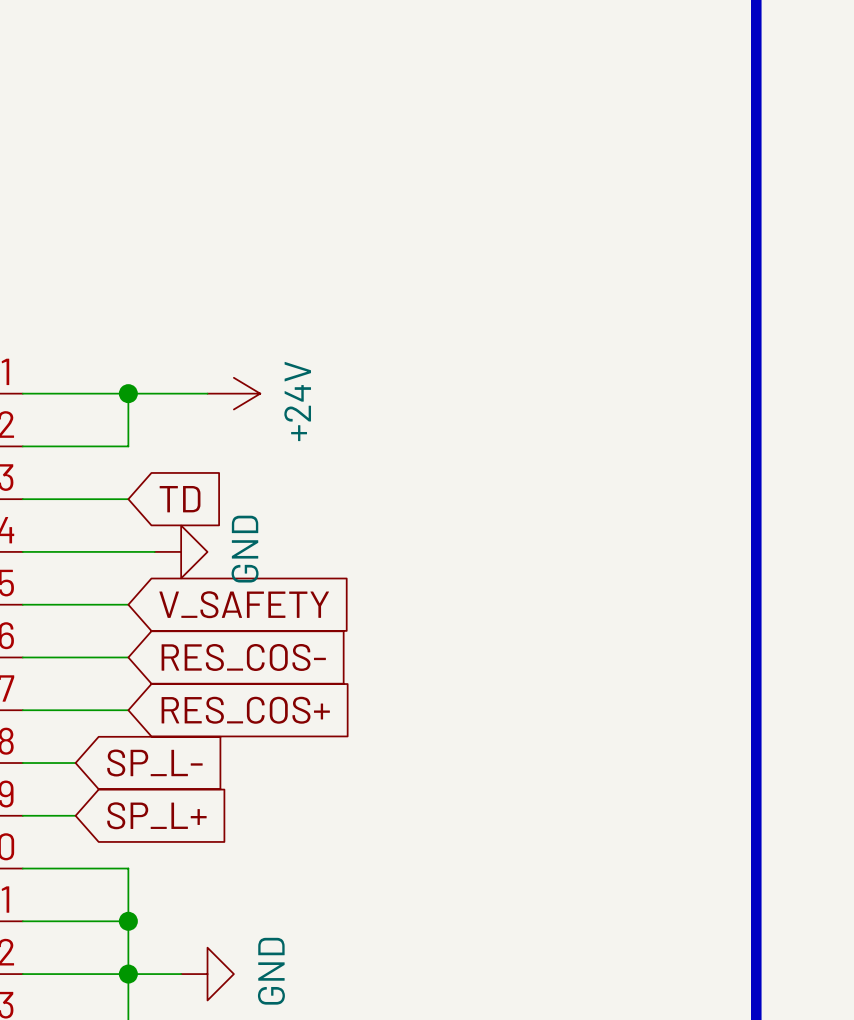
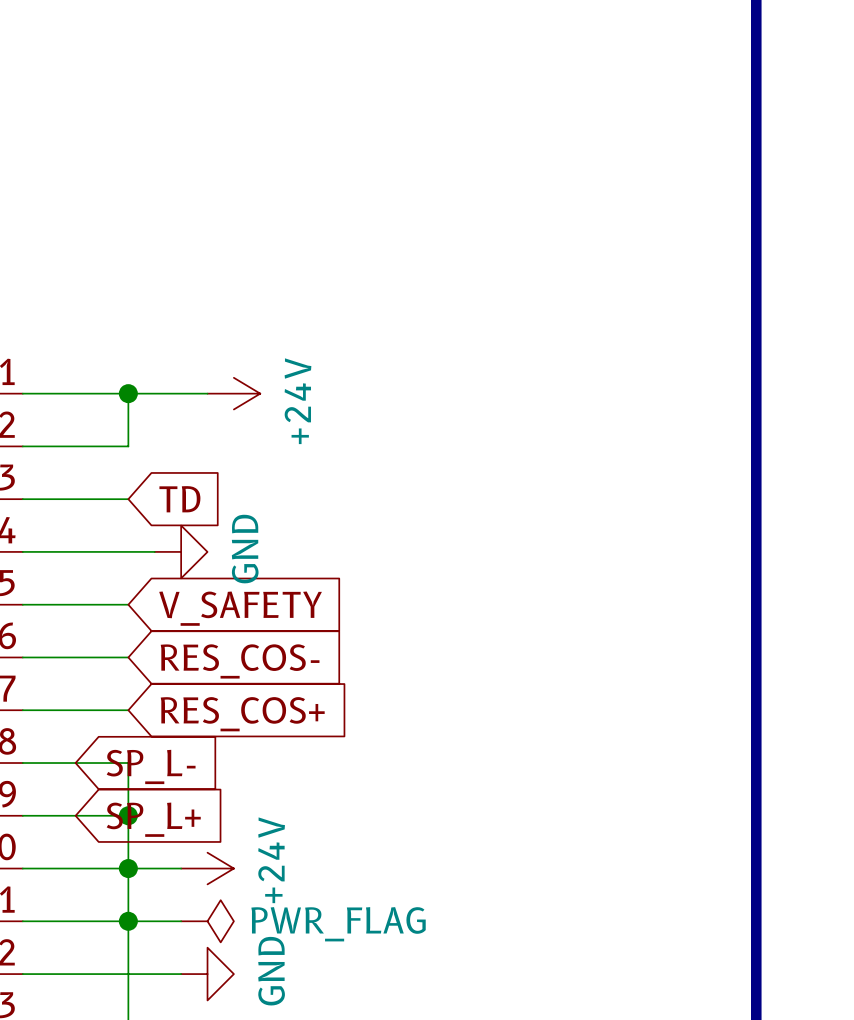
wire: none -> (75, 763) (128, 763) (128, 868) (181, 868)
wire: none -> (75, 815) (128, 815)
junction: none -> (128, 815)
junction: none -> (128, 868)
power symbol: none -> +24V (207, 868)
wire: none -> (128, 921) (181, 921)
power symbol: none -> PWR_FLAG (207, 921)
junction: (128, 974) -> none

